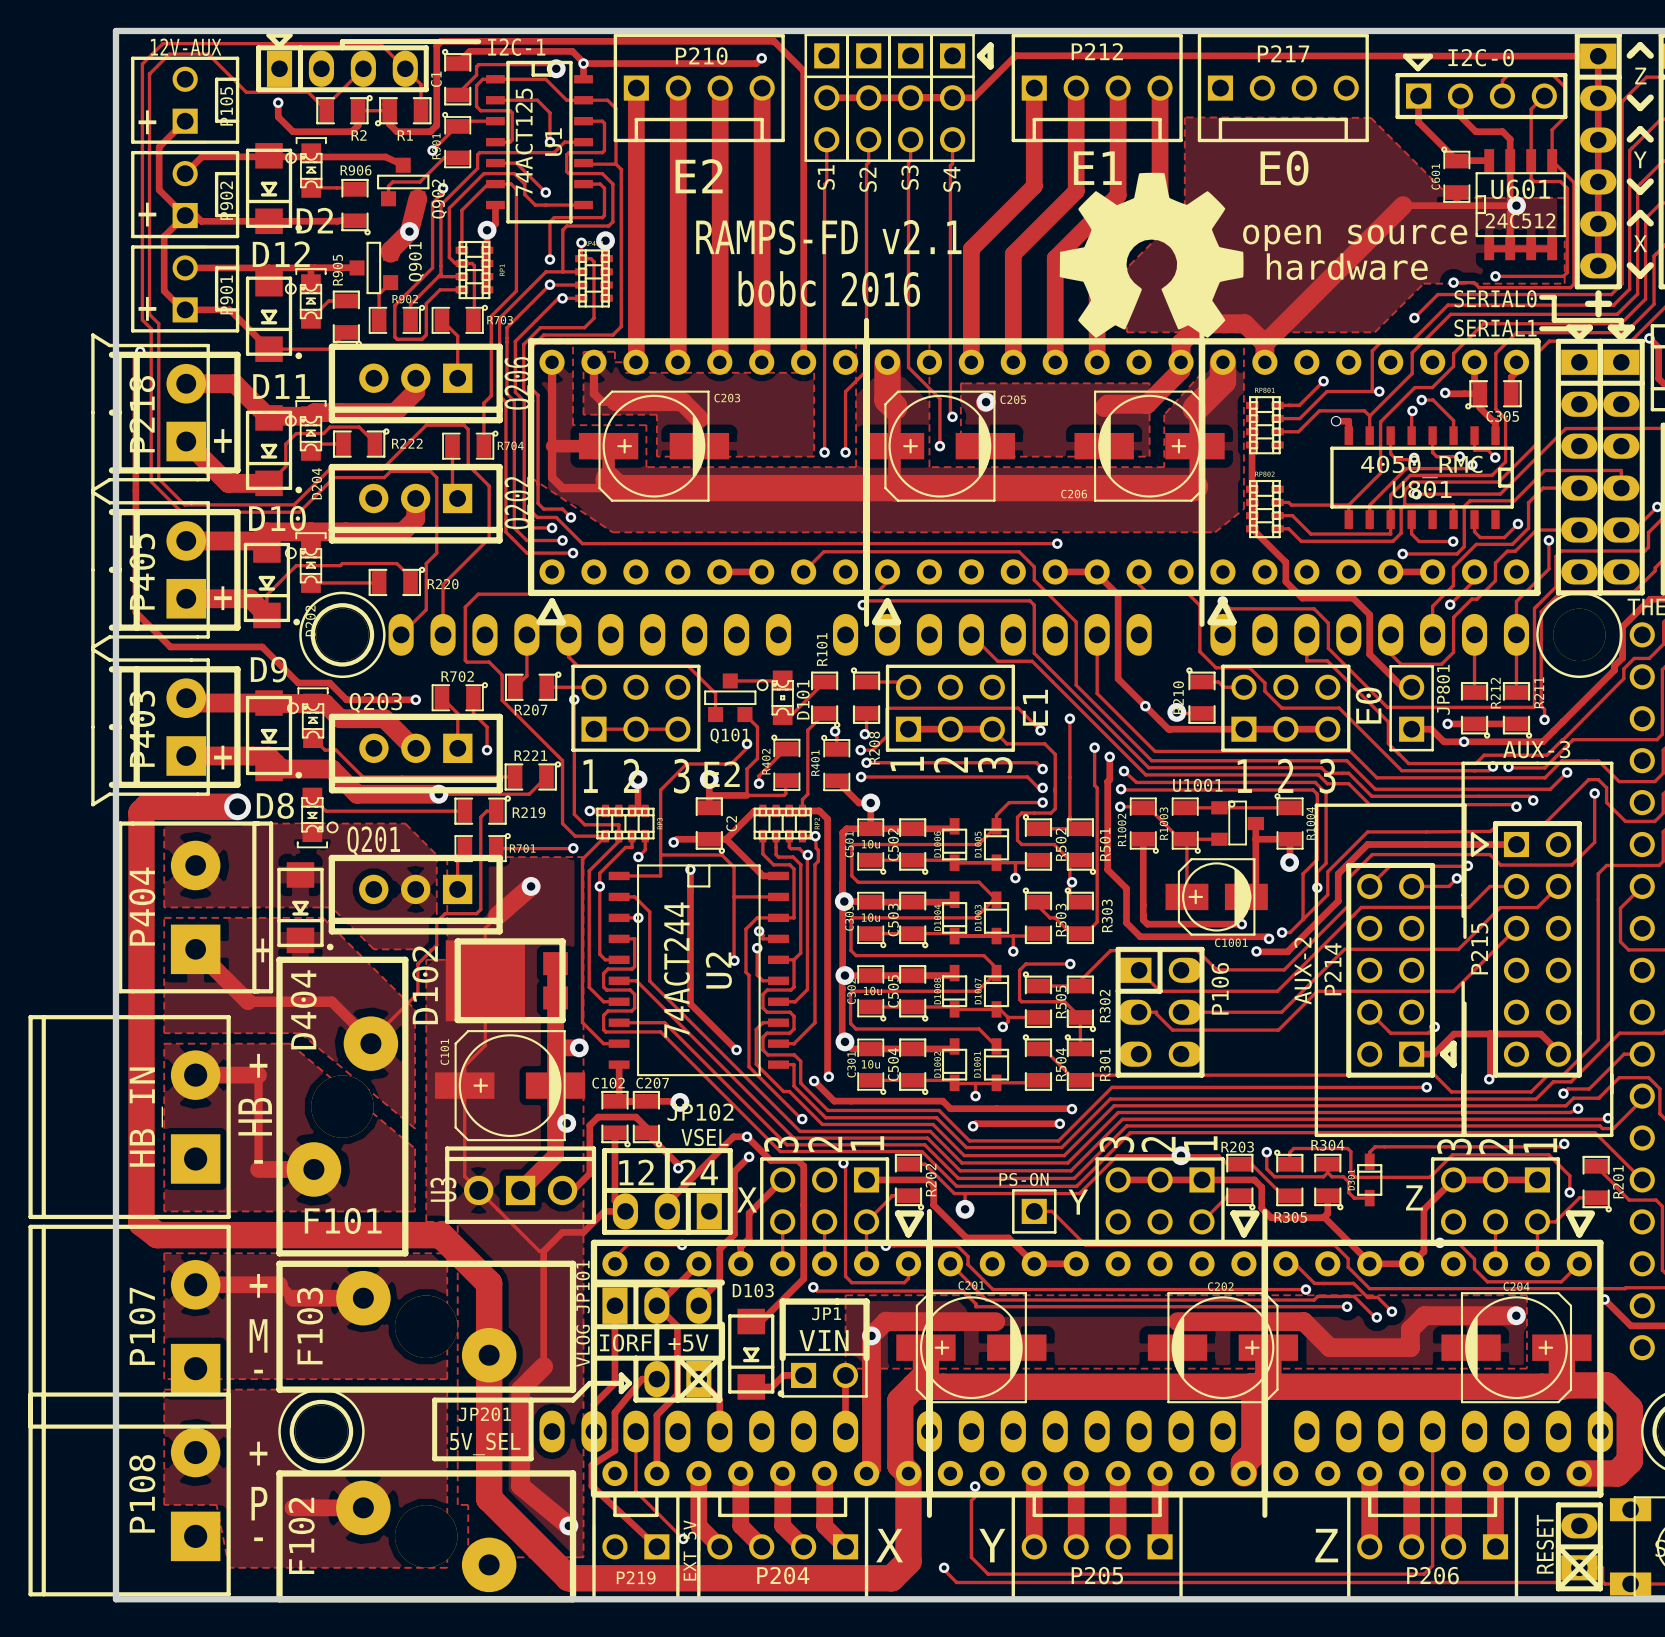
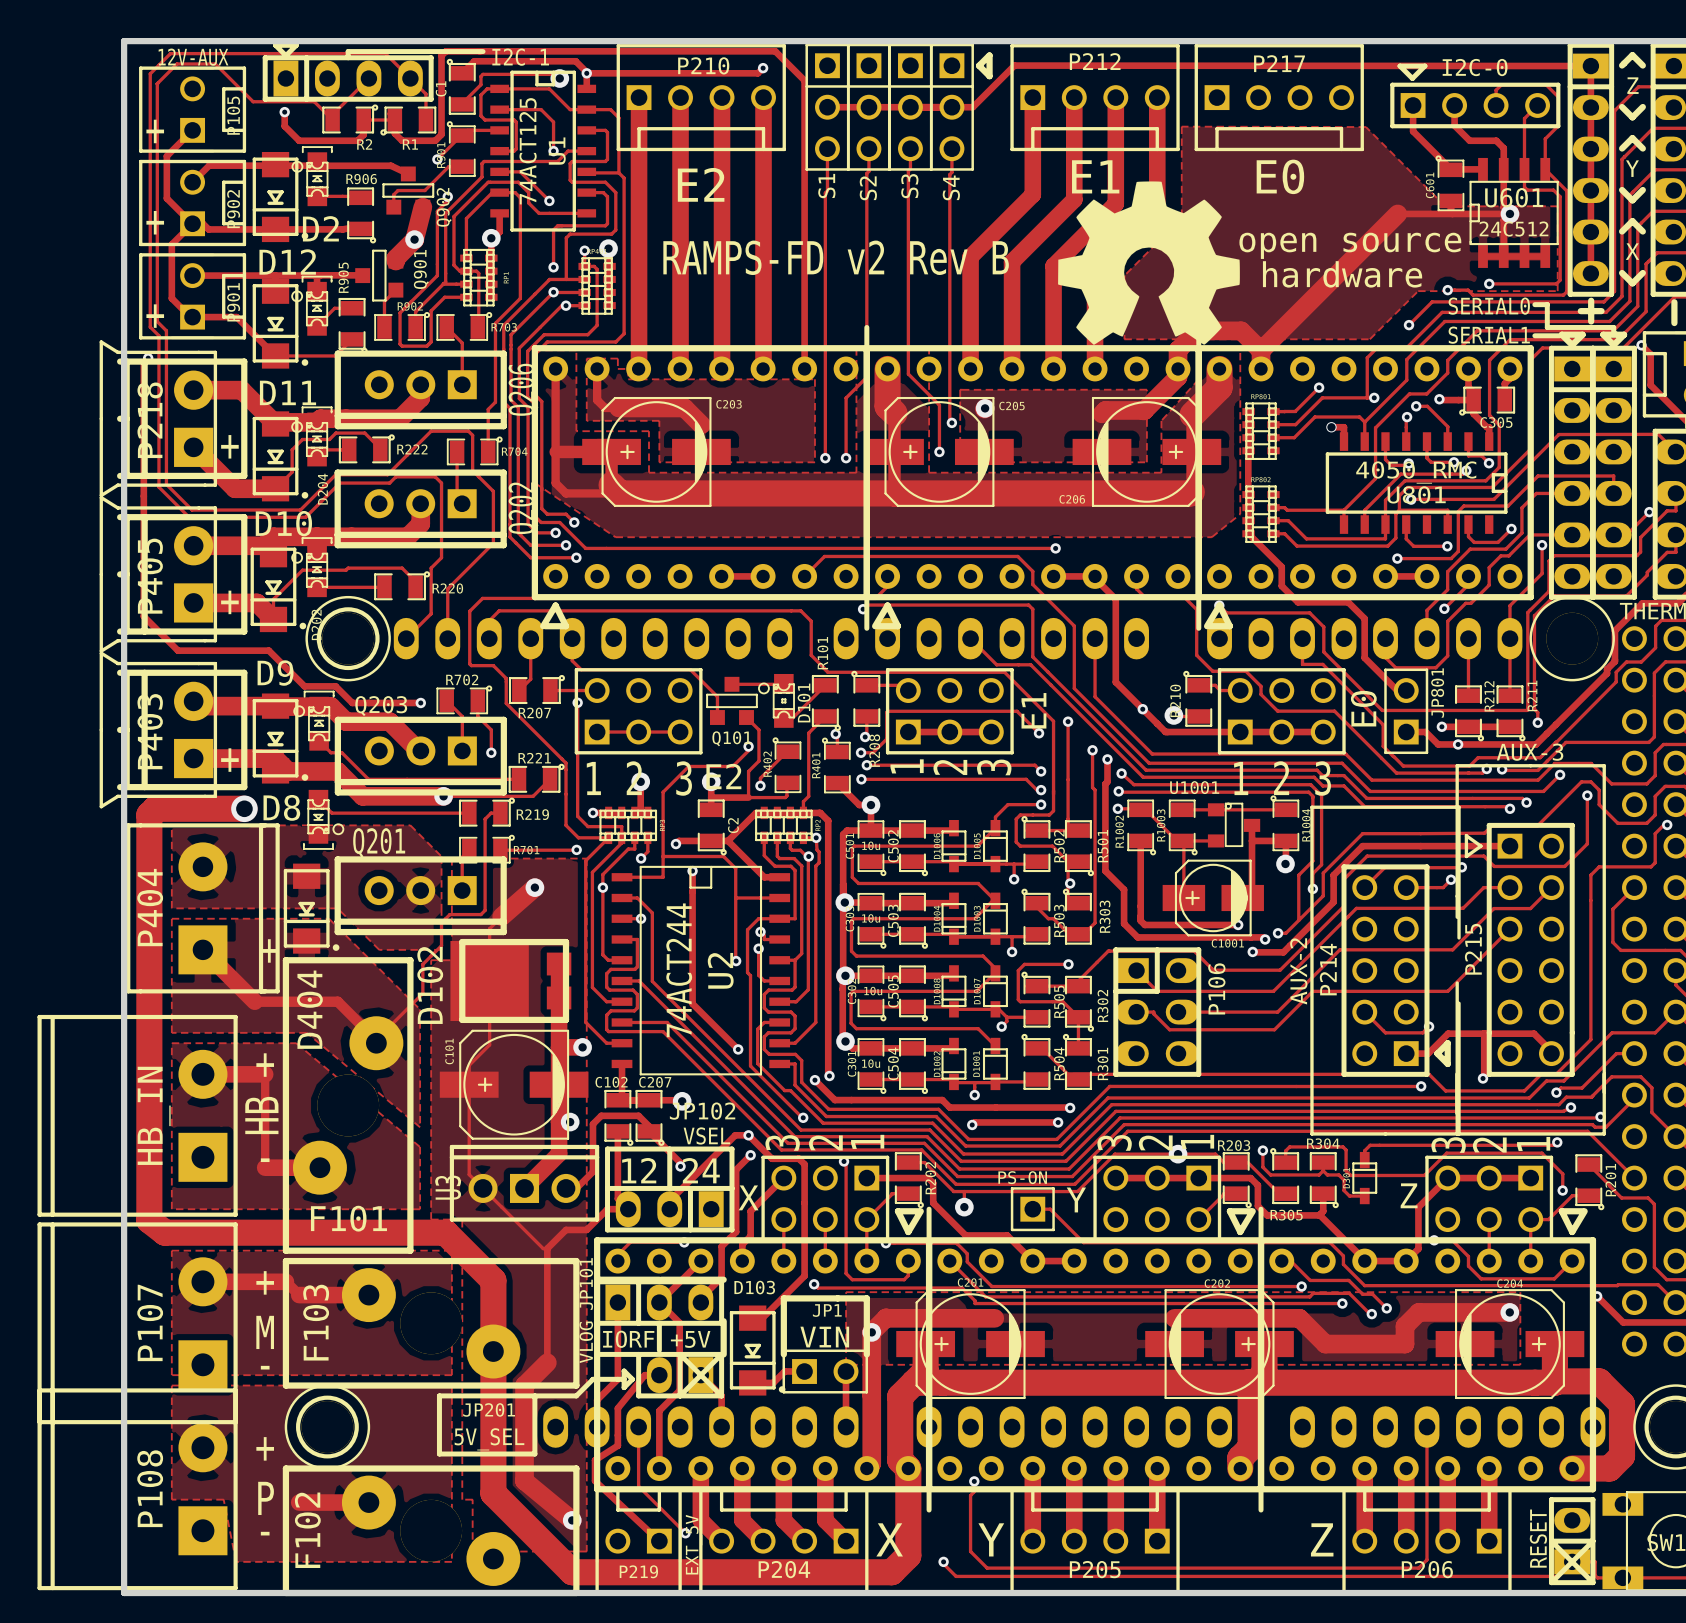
text: RAMPS-FD v2.1 (828, 237) -> RAMPS-FD v2 Rev B (836, 257)
text: bobc 2016 (829, 288) -> none
track: (992, 729) (1007, 743) (1044, 743) (1055, 754) -> (489, 638) (489, 620) (499, 610) (800, 610) (811, 621) (811, 655) (827, 672) (1004, 672) (1053, 721) (1053, 756)

